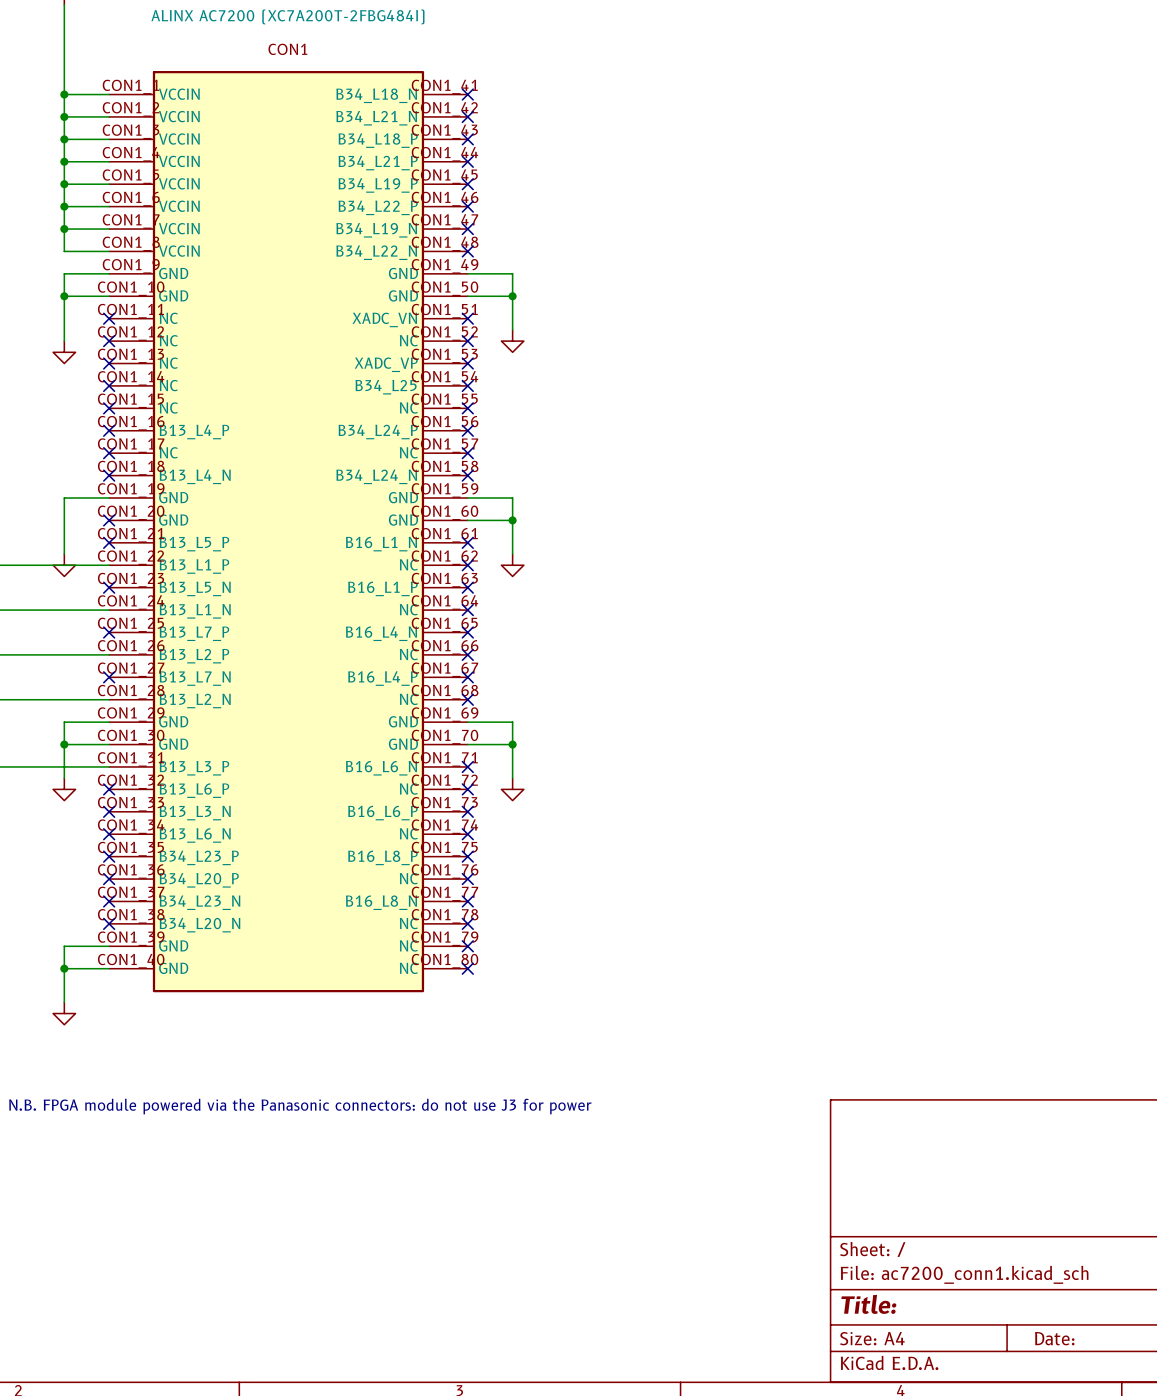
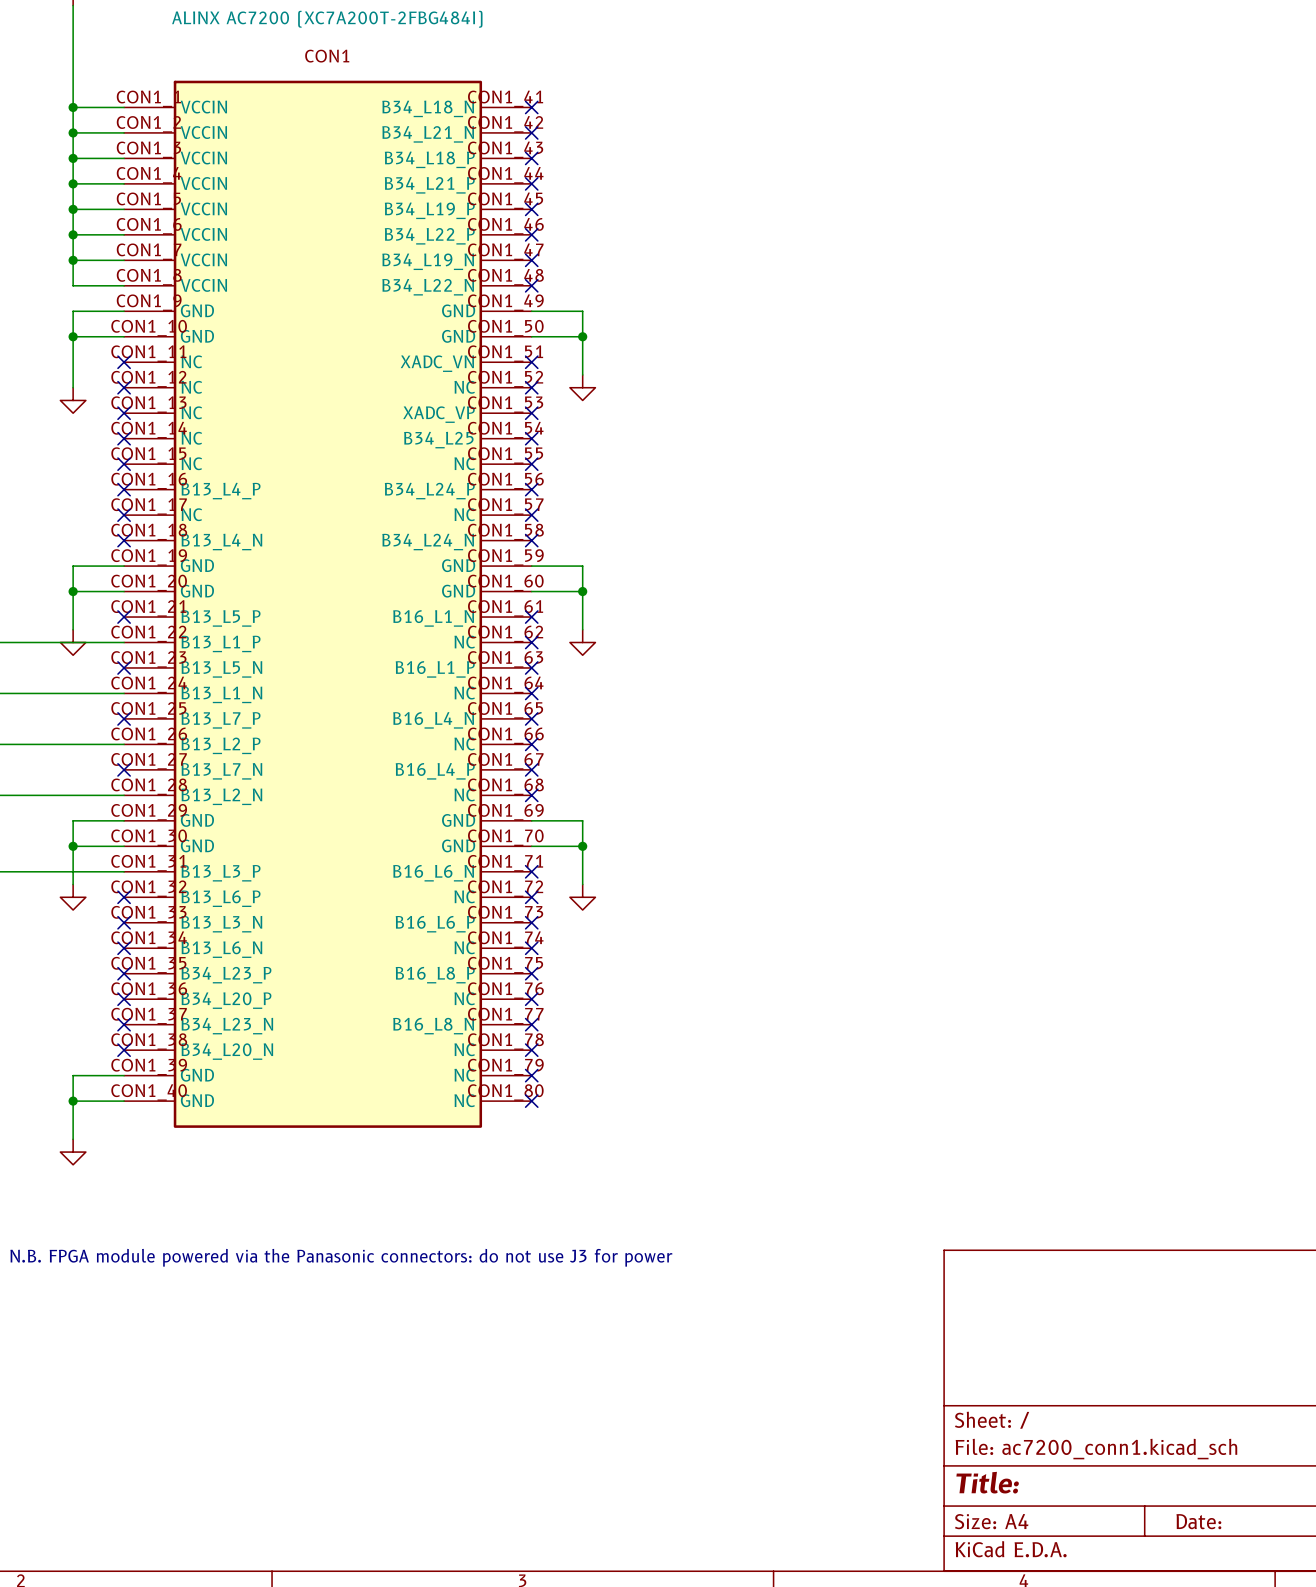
wire: none -> (73, 591) (124, 591)
junction: none -> (73, 591)
no-connect mark: (109, 520) -> none

